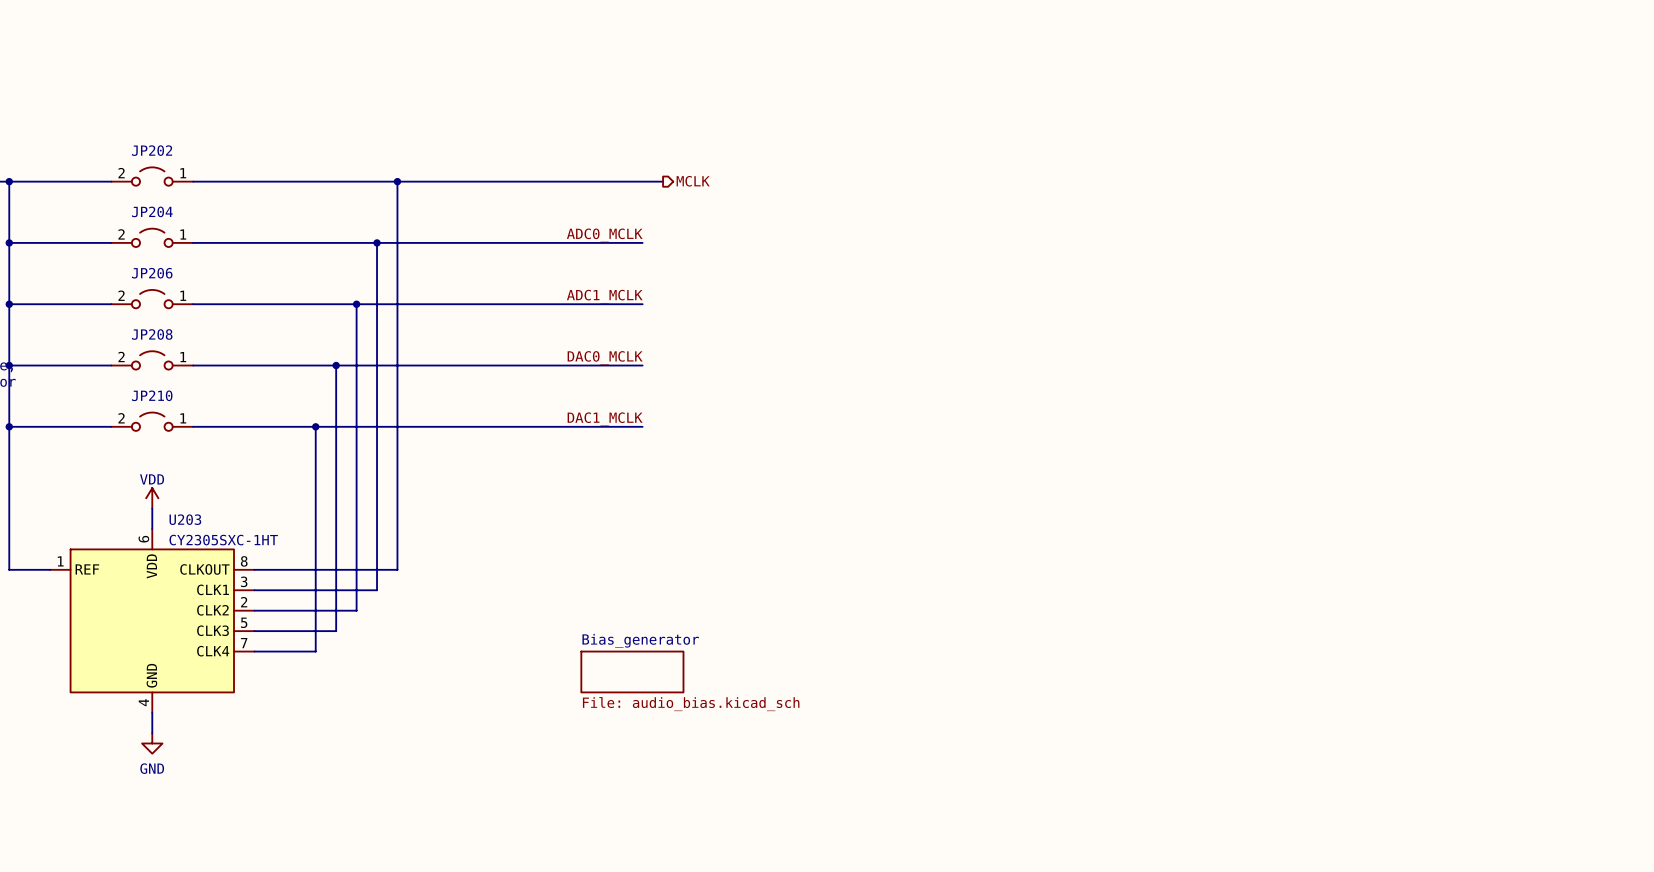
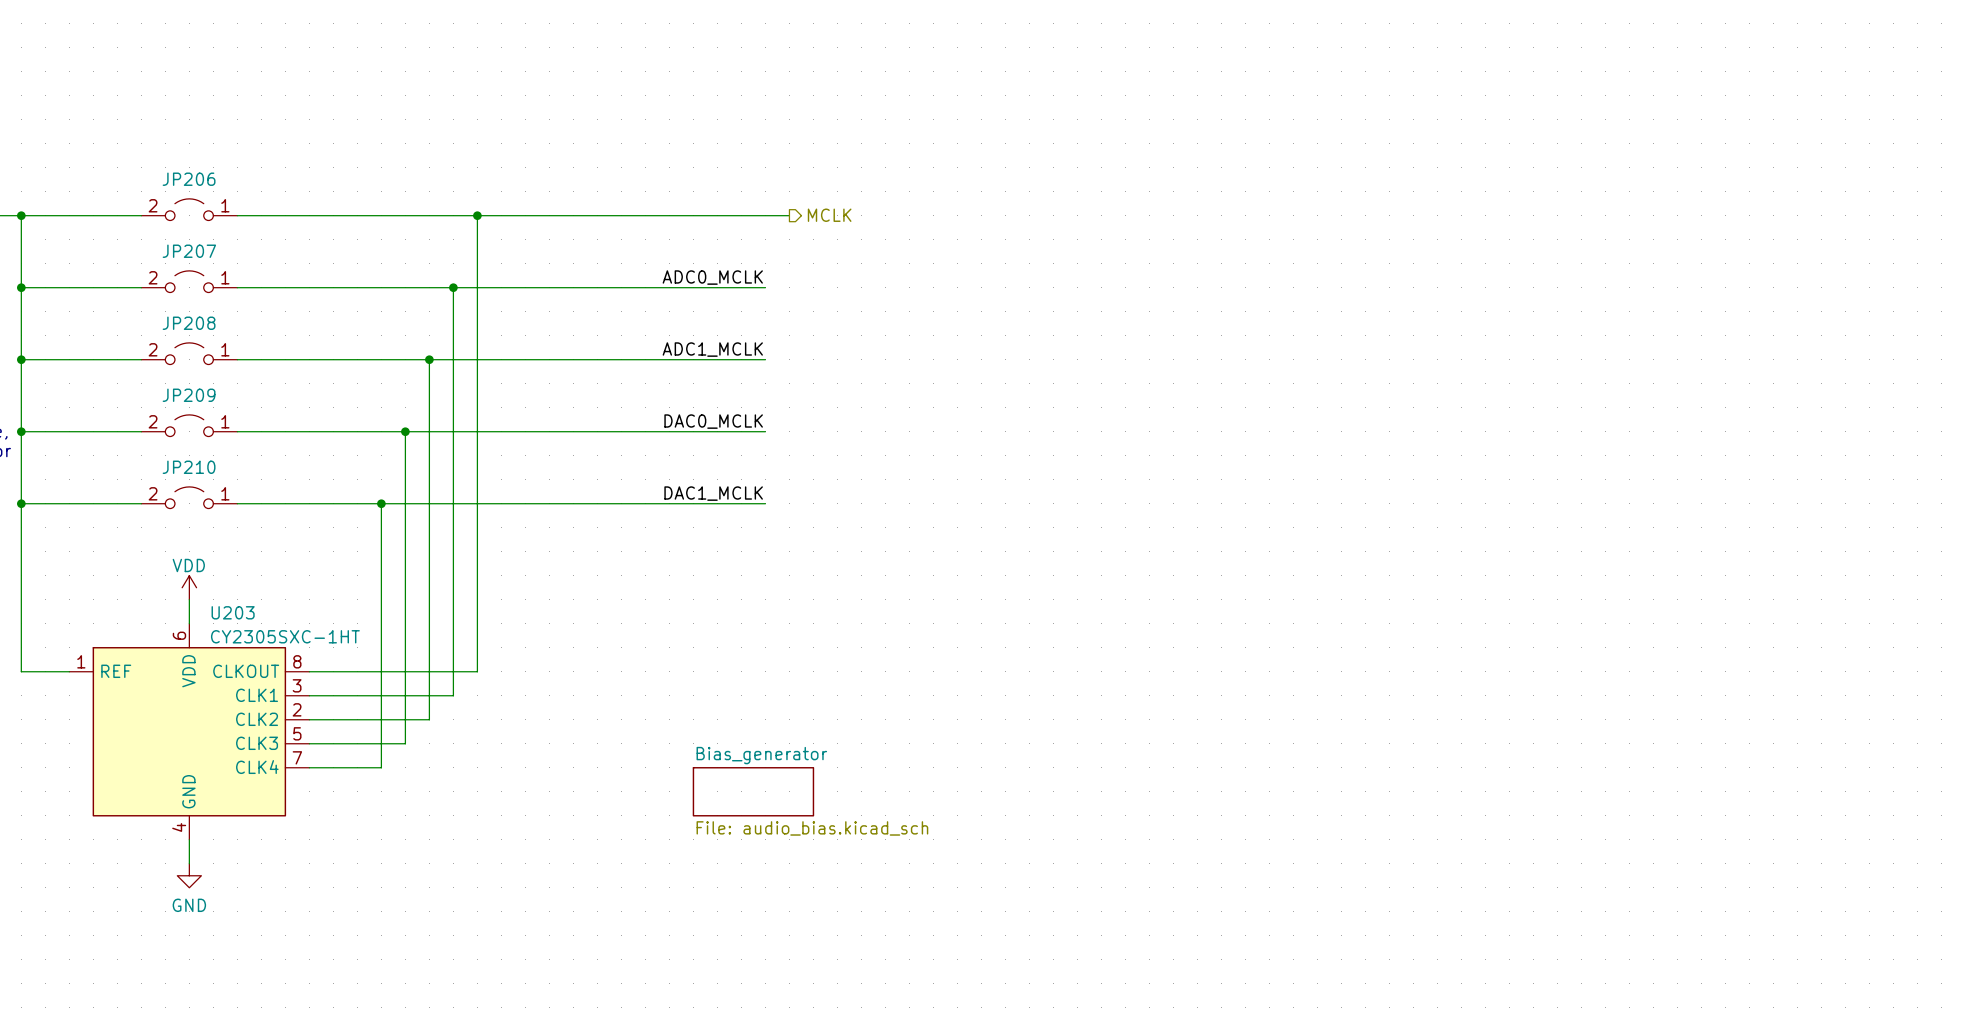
JP202 name: JP202 (152, 150) -> JP206 (189, 179)
JP204 name: JP204 (152, 211) -> JP207 (189, 251)
JP206 name: JP206 (152, 273) -> JP208 (189, 323)
JP208 name: JP208 (152, 334) -> JP209 (189, 395)

